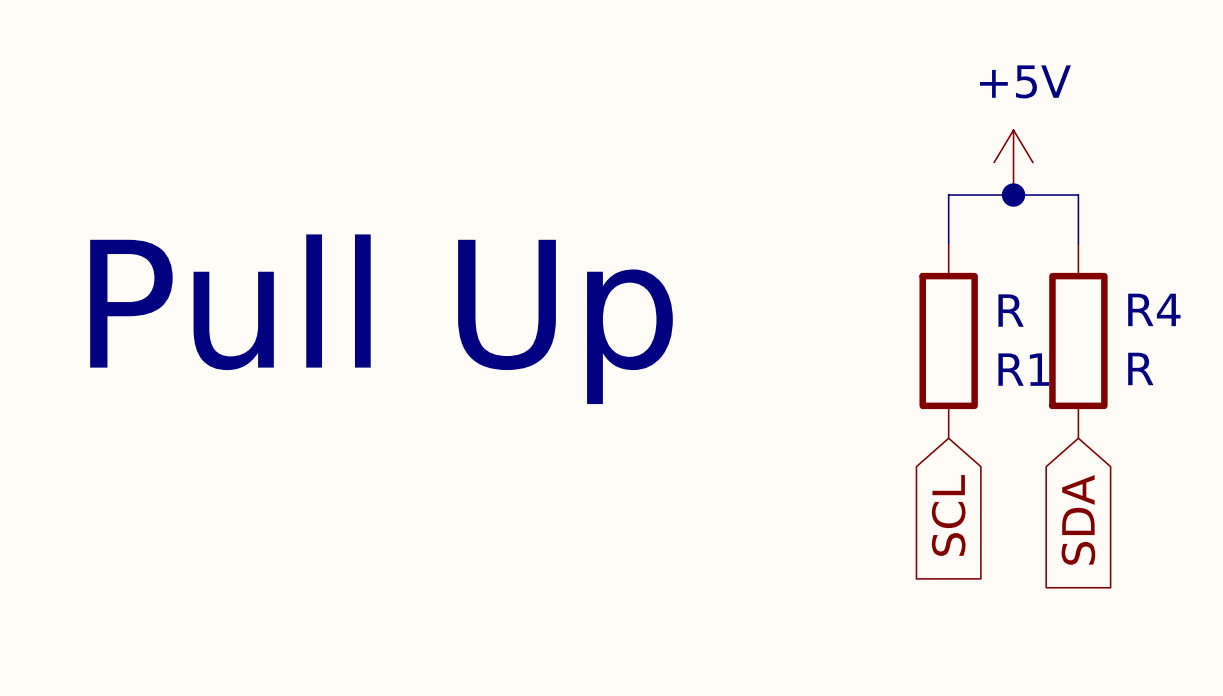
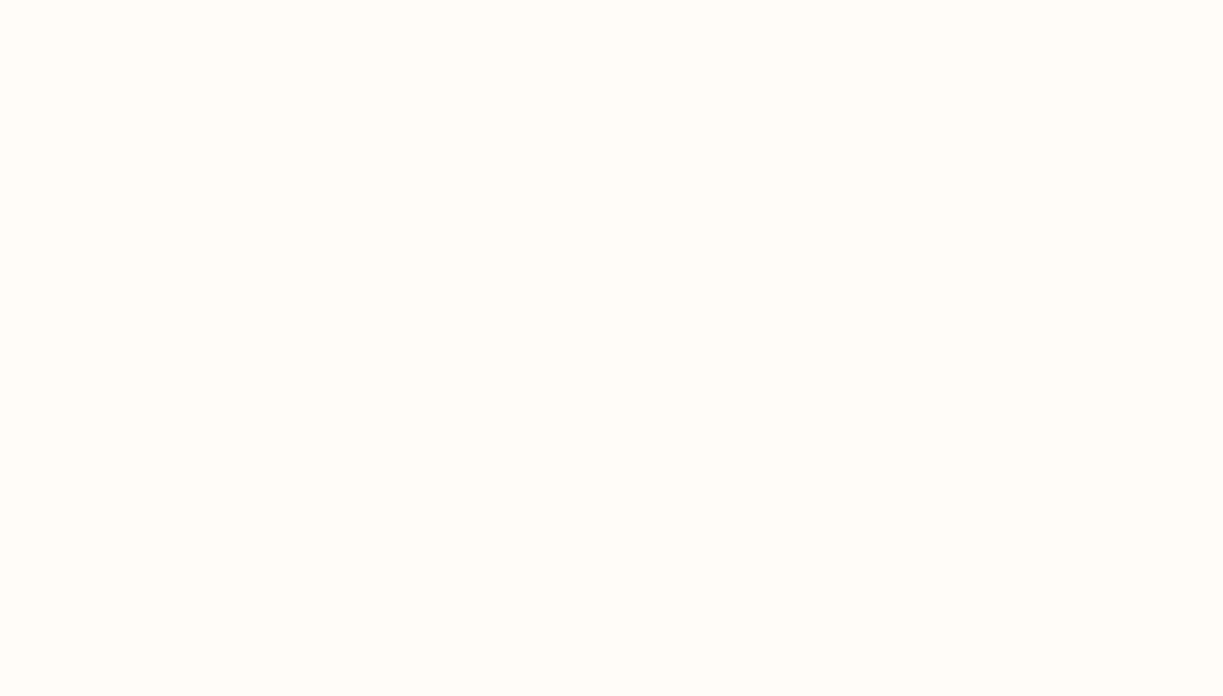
power symbol: +5V (1013, 162) -> none
junction: (1013, 195) -> none
wire: (948, 243) (948, 195) (1078, 195) (1078, 243) -> none
text: Pull Up (381, 319) -> none
R1: R (948, 340) -> none
R4: R (1078, 340) -> none
global label: SCL (948, 515) -> none
global label: SDA (1078, 519) -> none

